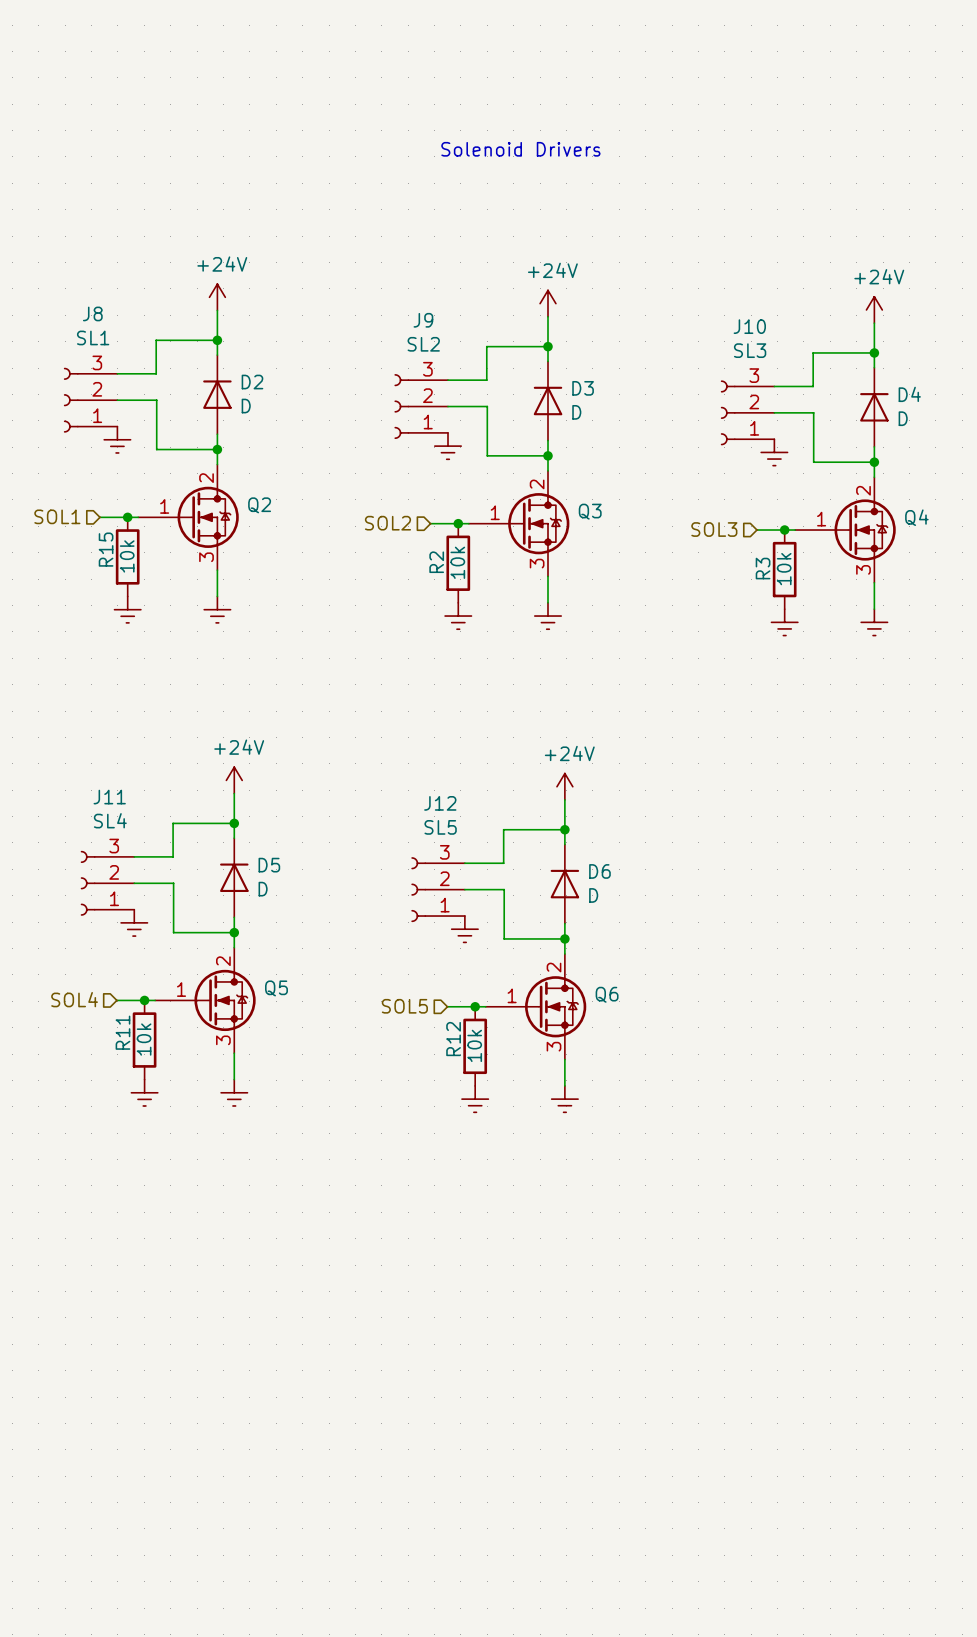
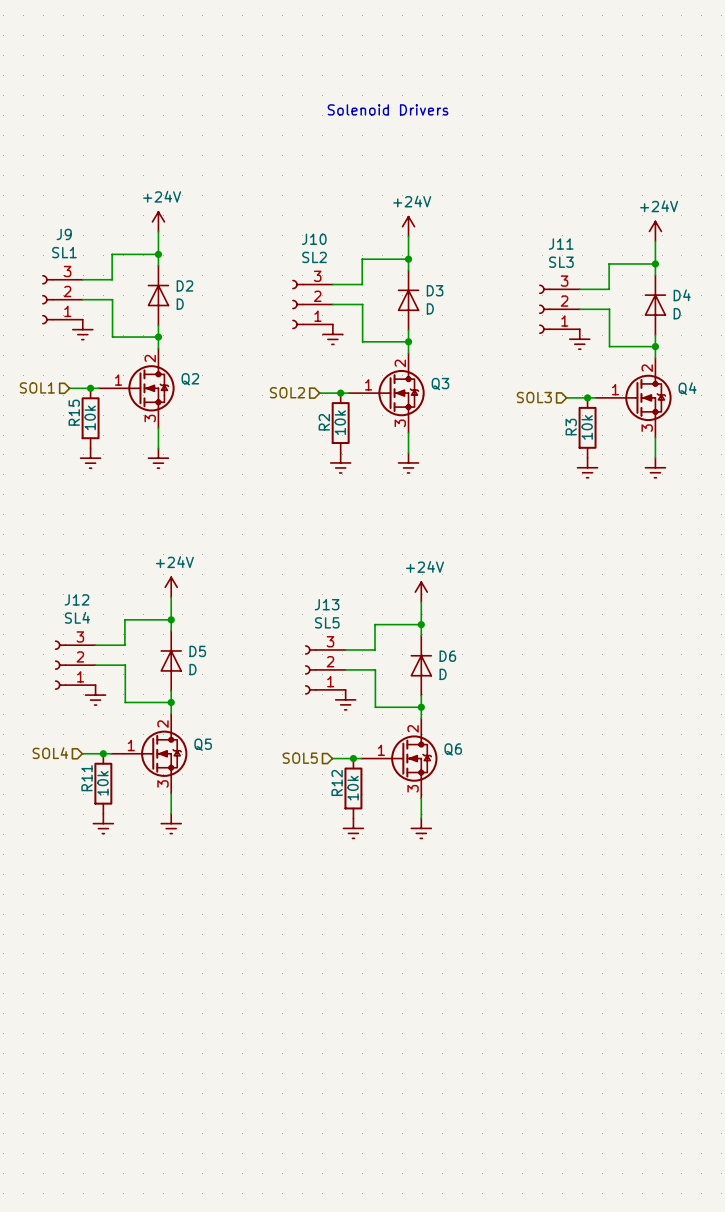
J8 name: J8 (92, 313) -> J9 (64, 234)
J9 name: J9 (423, 320) -> J10 (314, 239)
J10 name: J10 (749, 326) -> J11 (561, 244)
J11 name: J11 (109, 797) -> J12 (76, 599)
J12 name: J12 (440, 803) -> J13 (327, 604)

